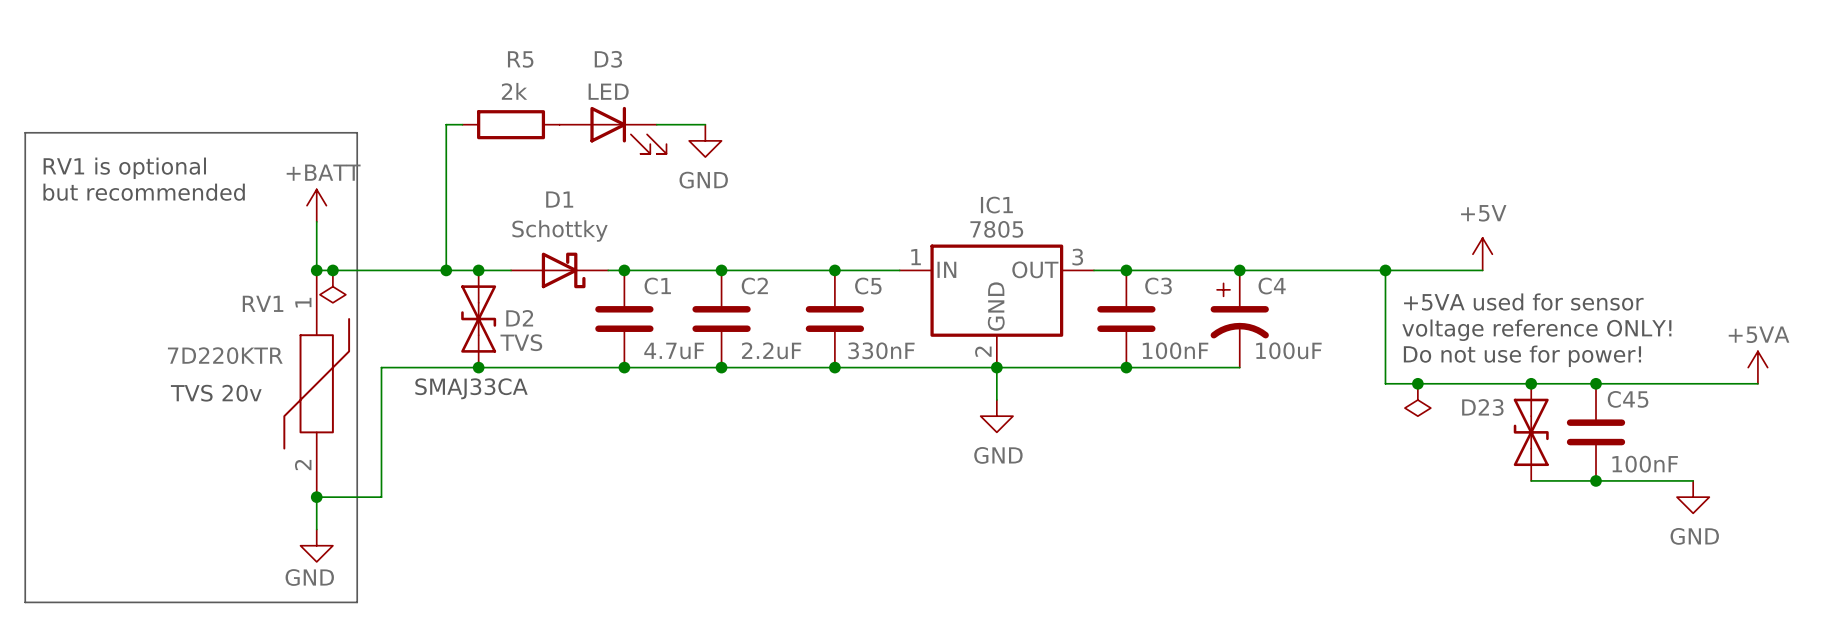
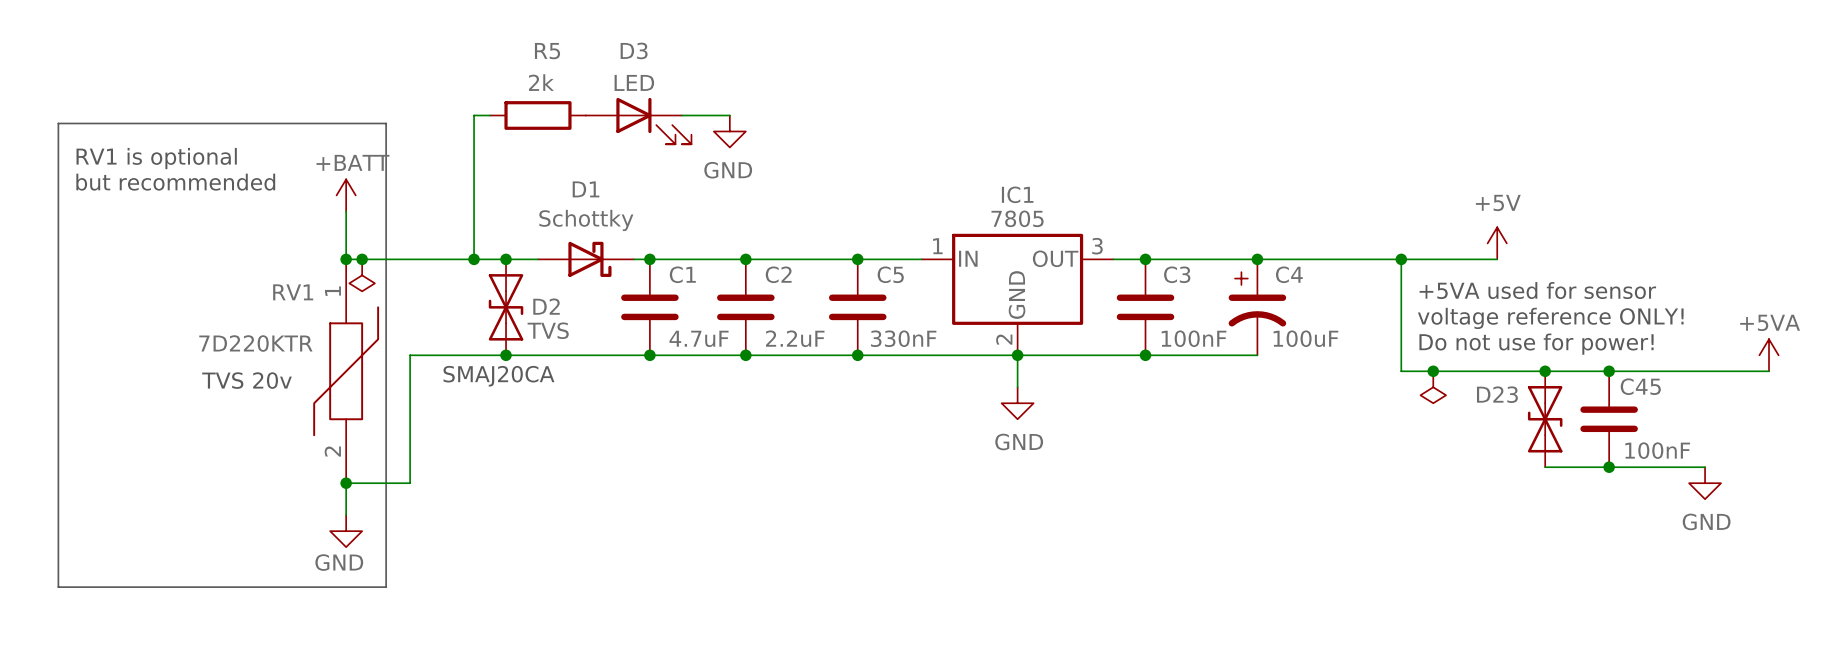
text: SMAJ33CA (471, 388) -> SMAJ20CA (498, 376)

